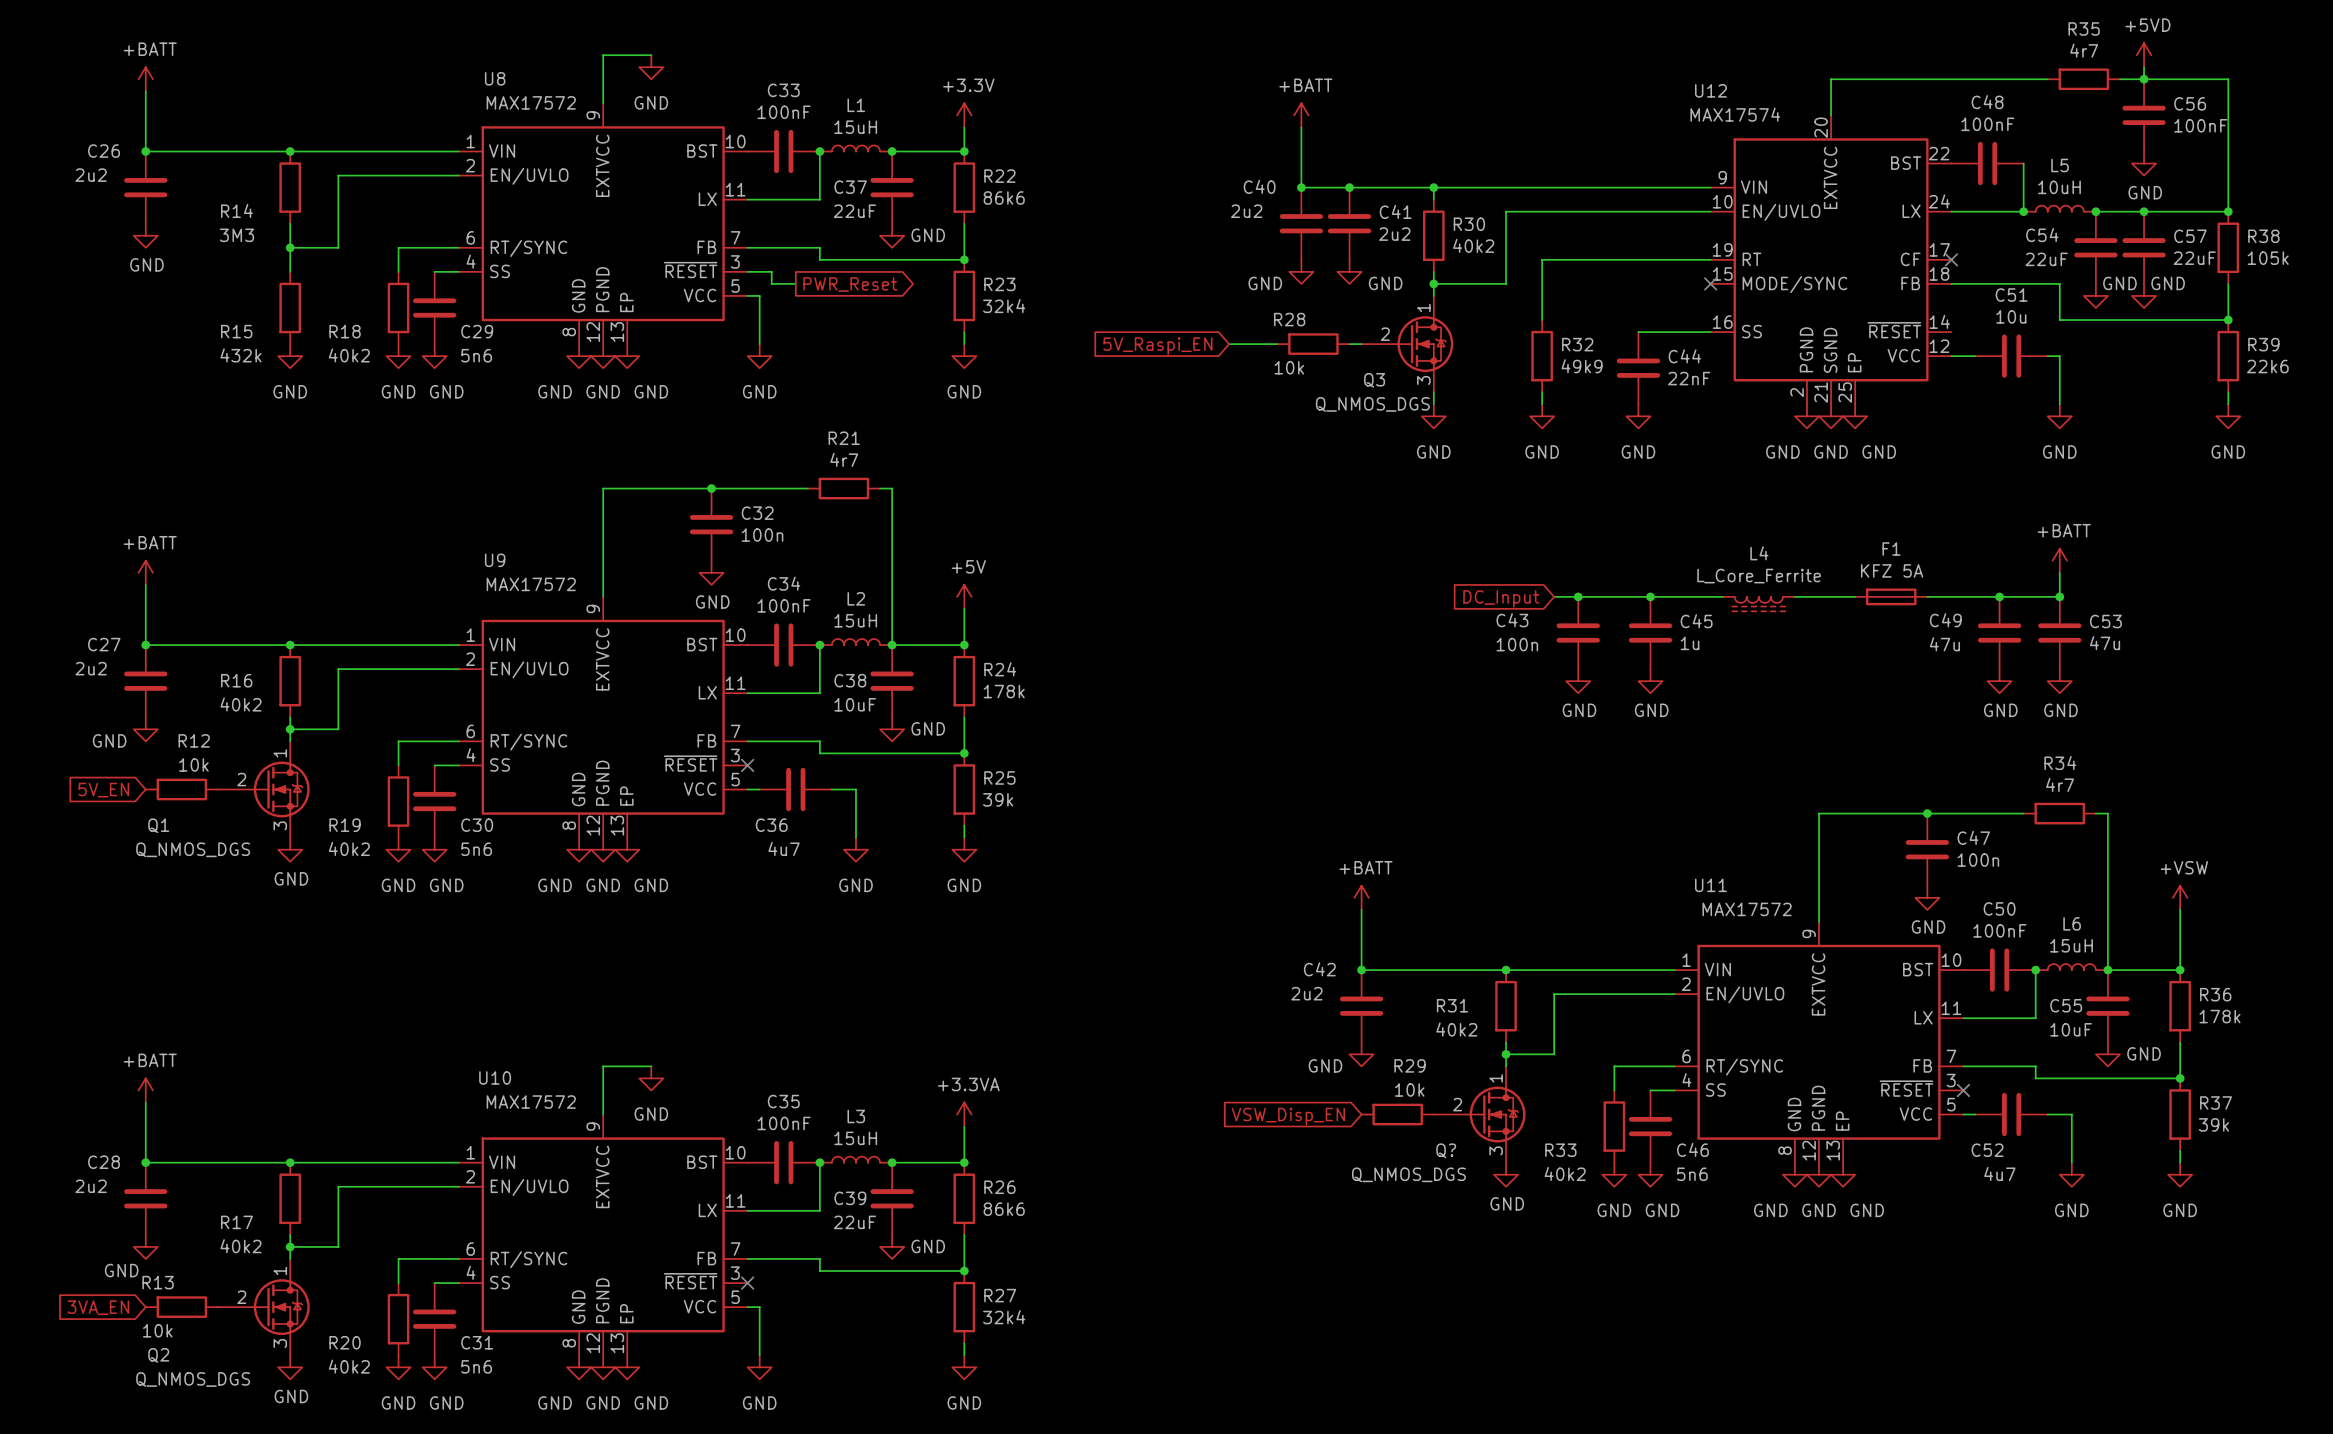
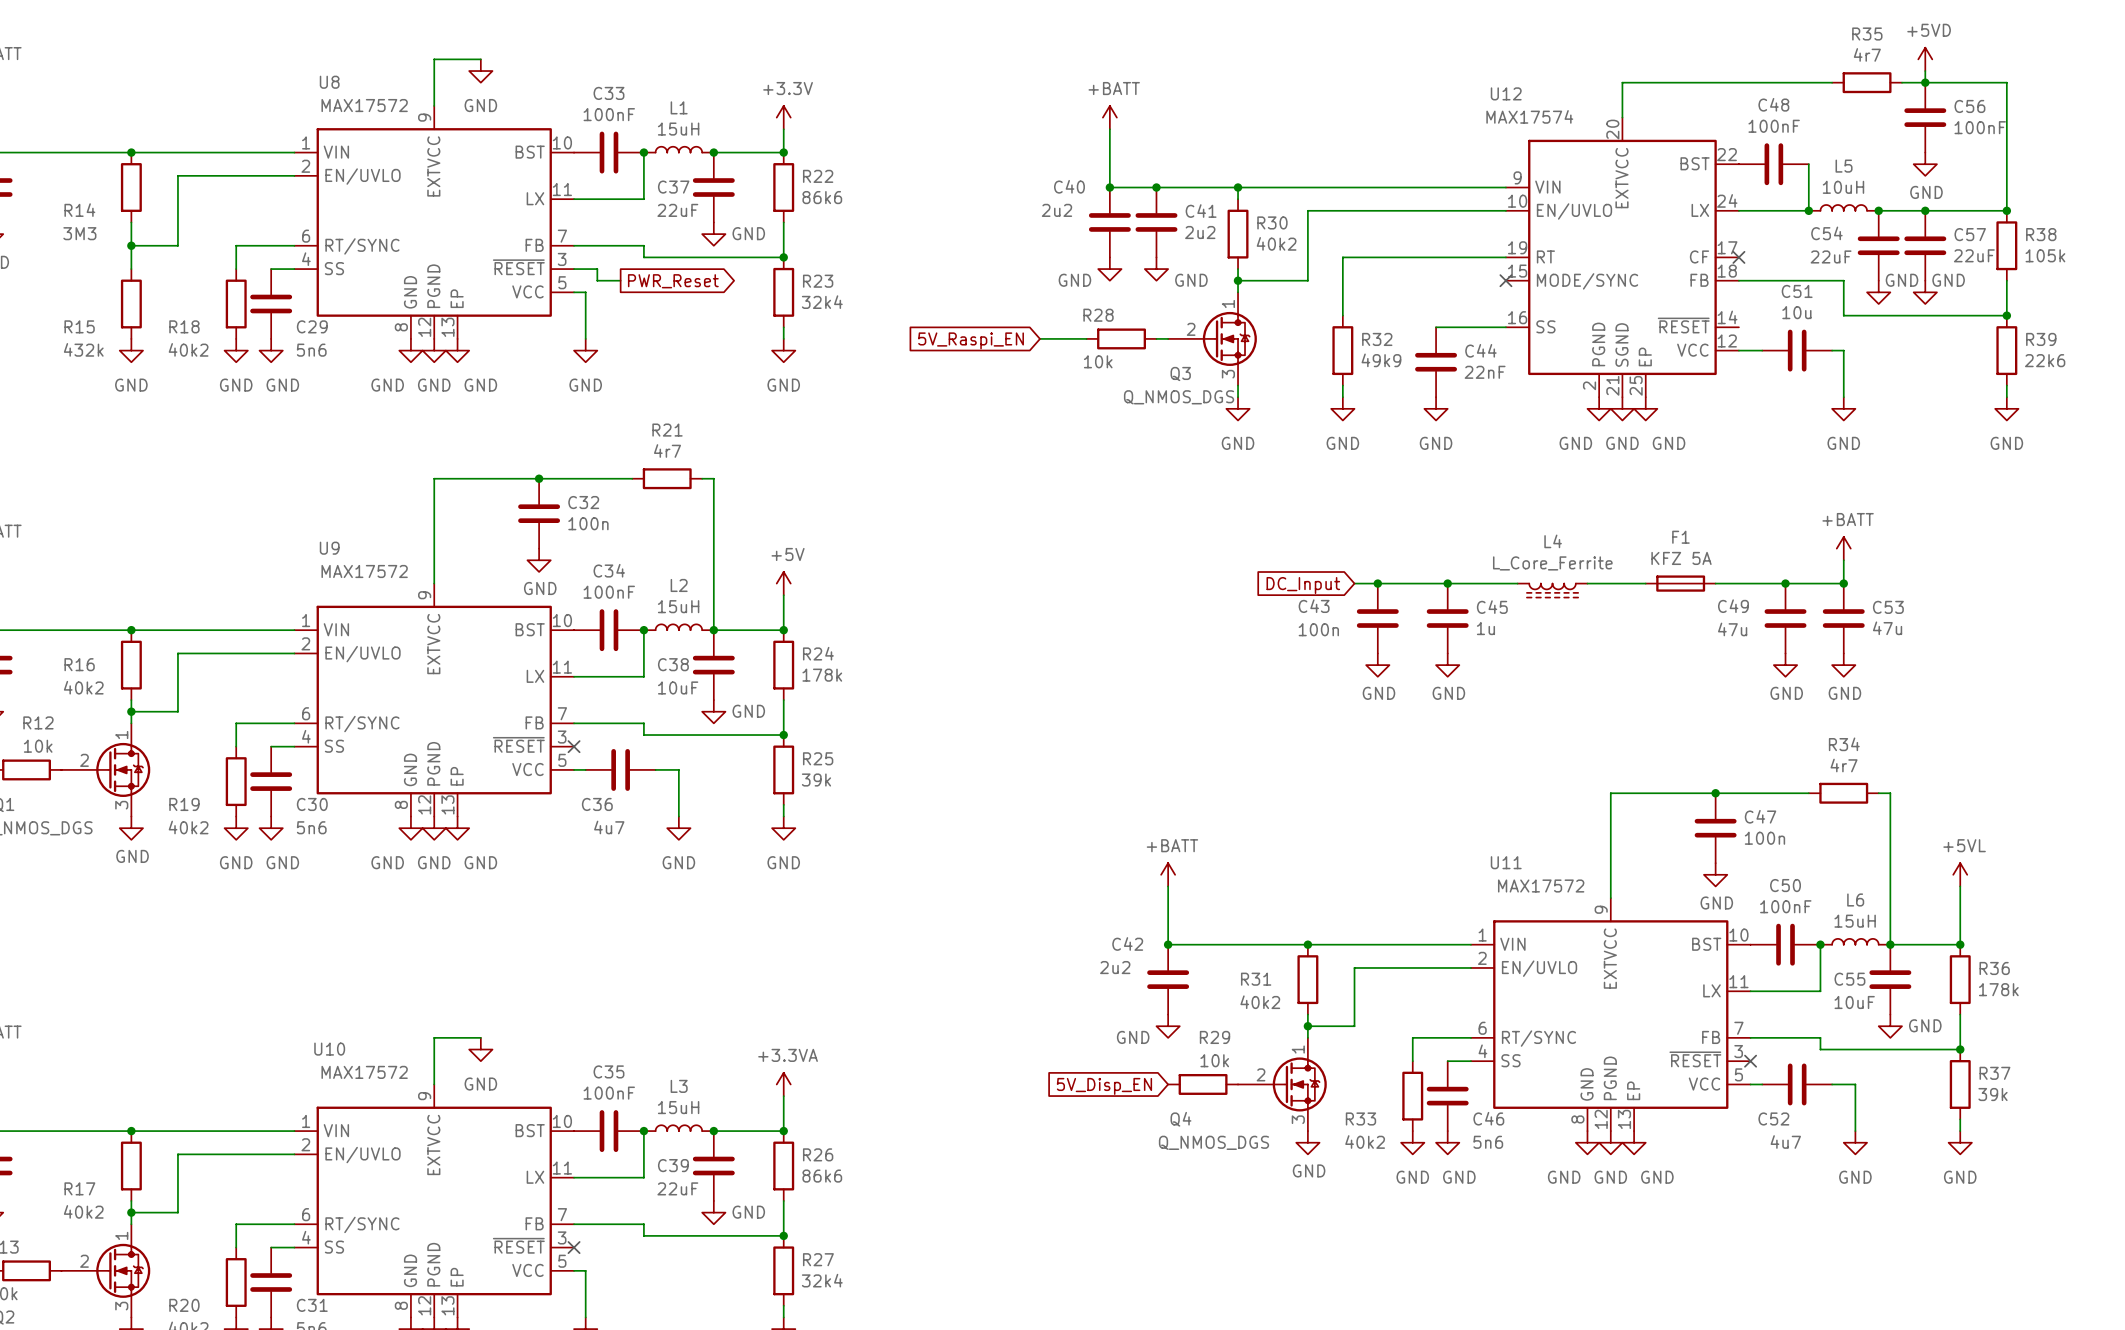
power symbol: +VSW (2180, 897) -> +5VL (1960, 874)
global label: VSW_Disp_EN (1288, 1116) -> 5V_Disp_EN (1104, 1086)
Q? name: Q? (1446, 1150) -> Q4 (1180, 1119)

